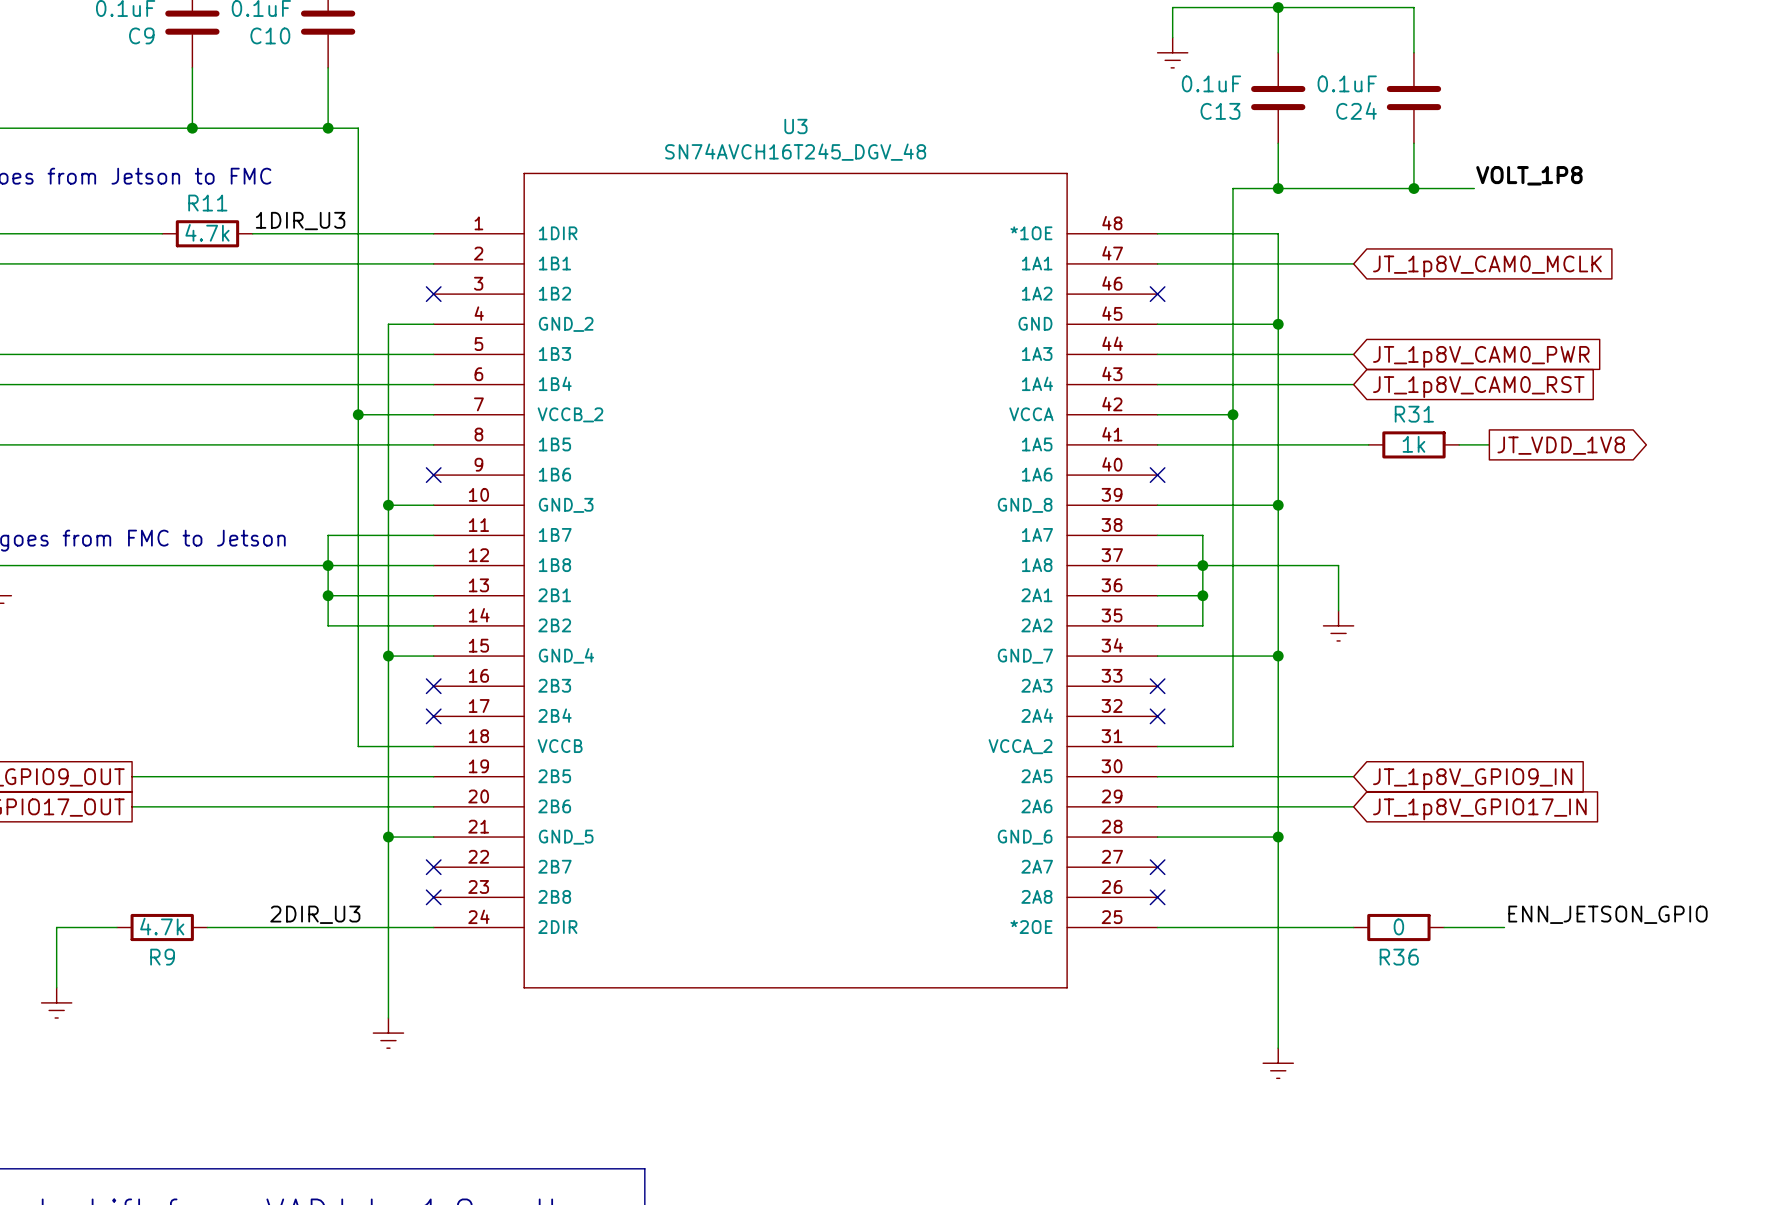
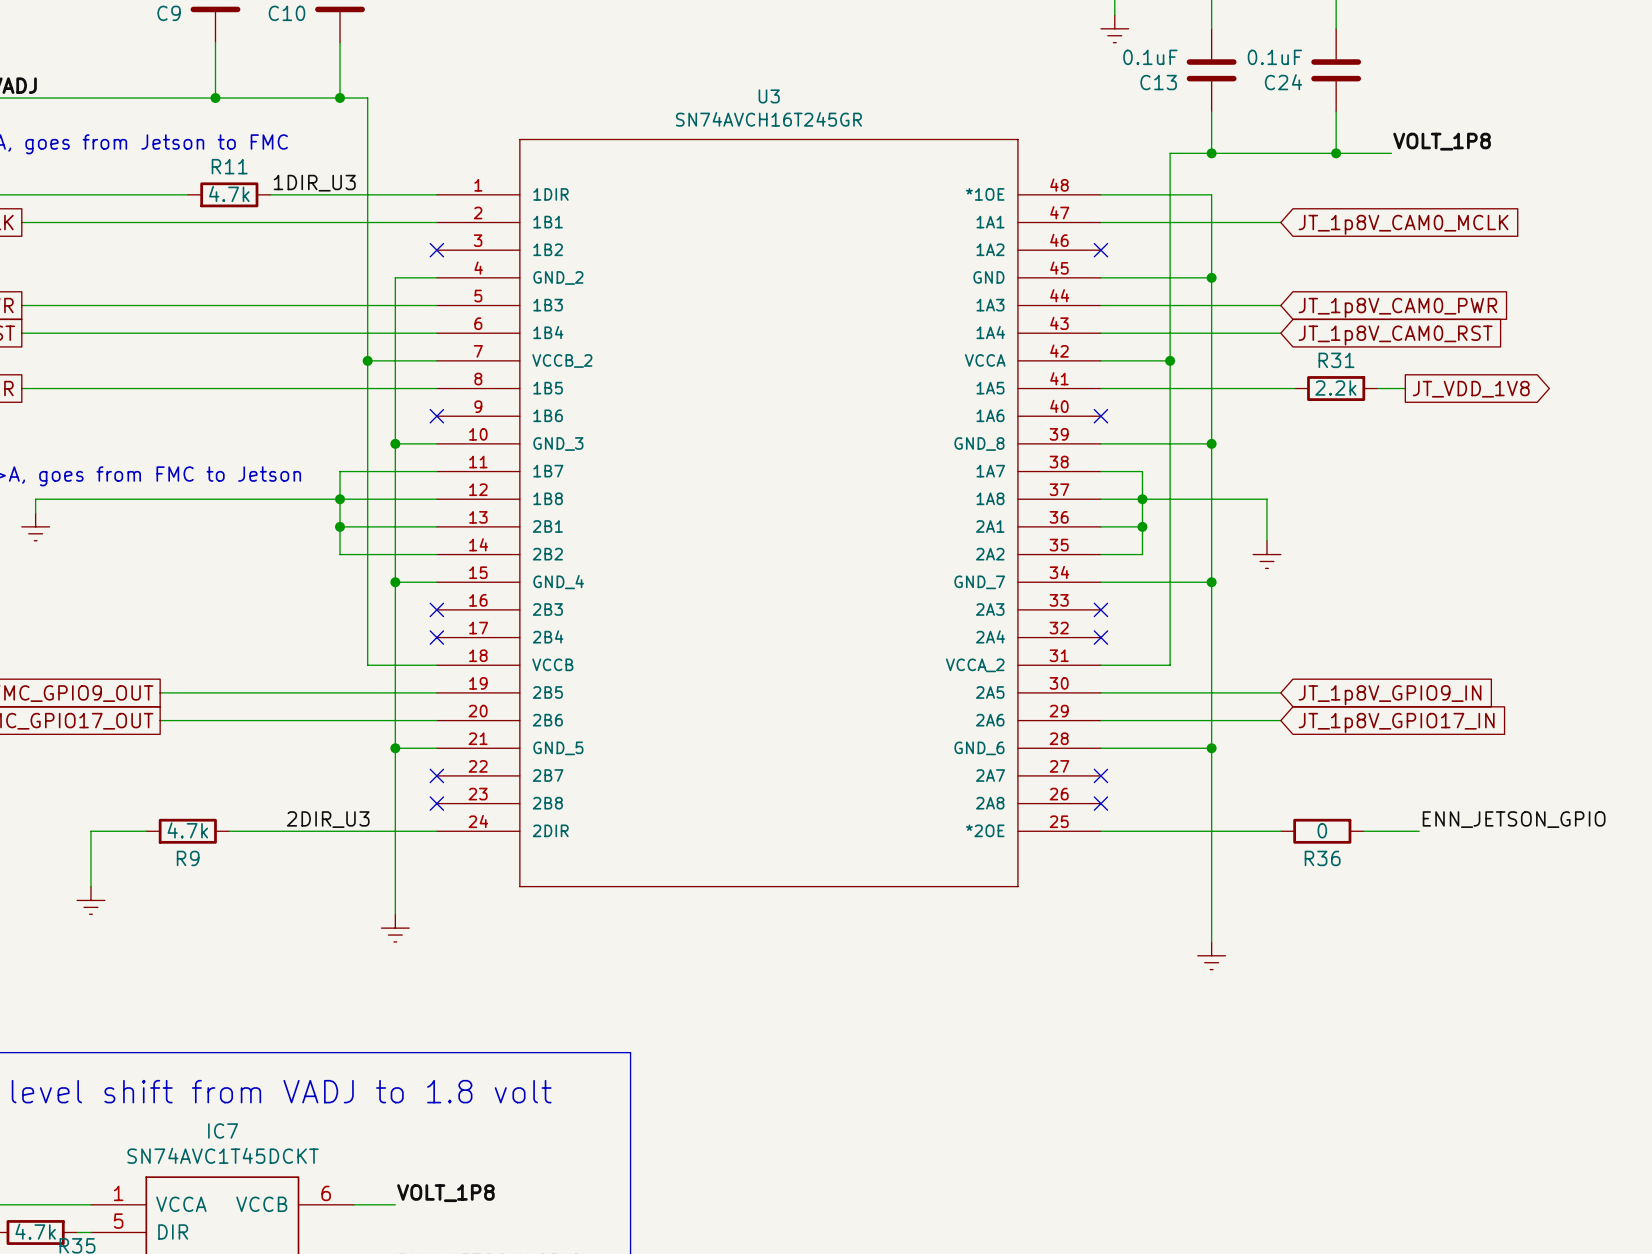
U3 value: SN74AVCH16T245_DGV_48 (795, 152) -> SN74AVCH16T245GR (768, 119)
R31 value: 1k (1413, 444) -> 2.2k (1335, 388)

